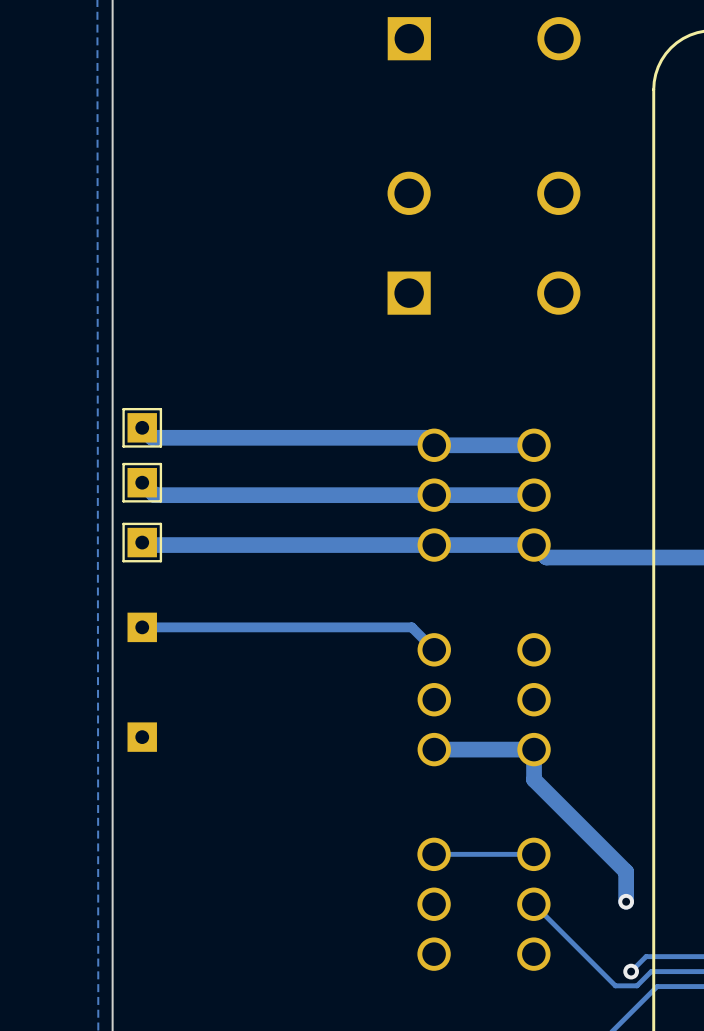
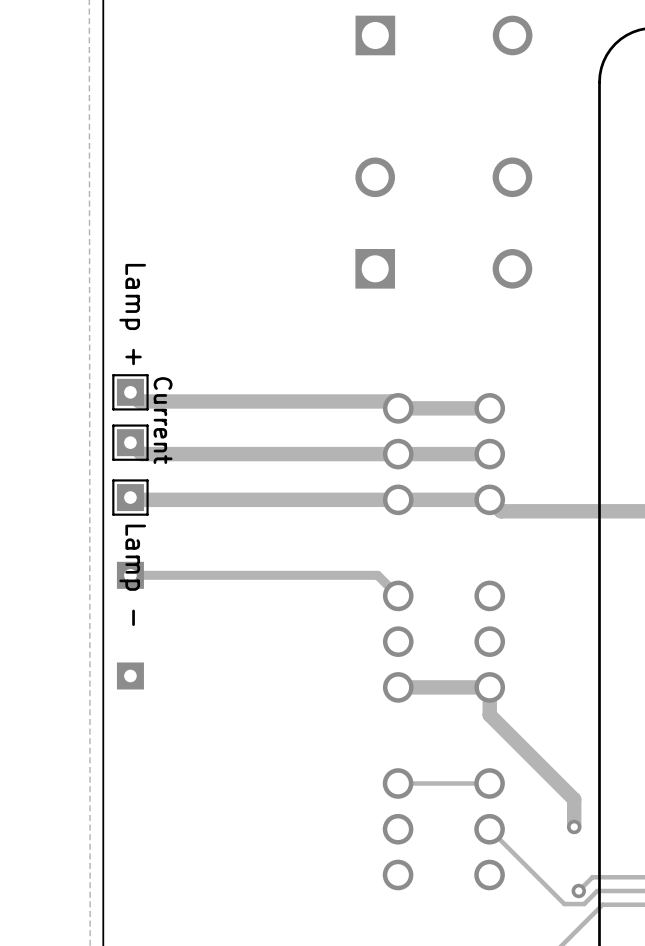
part text: none -> Lamp + (132, 314)
part text: none -> Current (163, 420)
part text: none -> Lamp - (132, 575)

